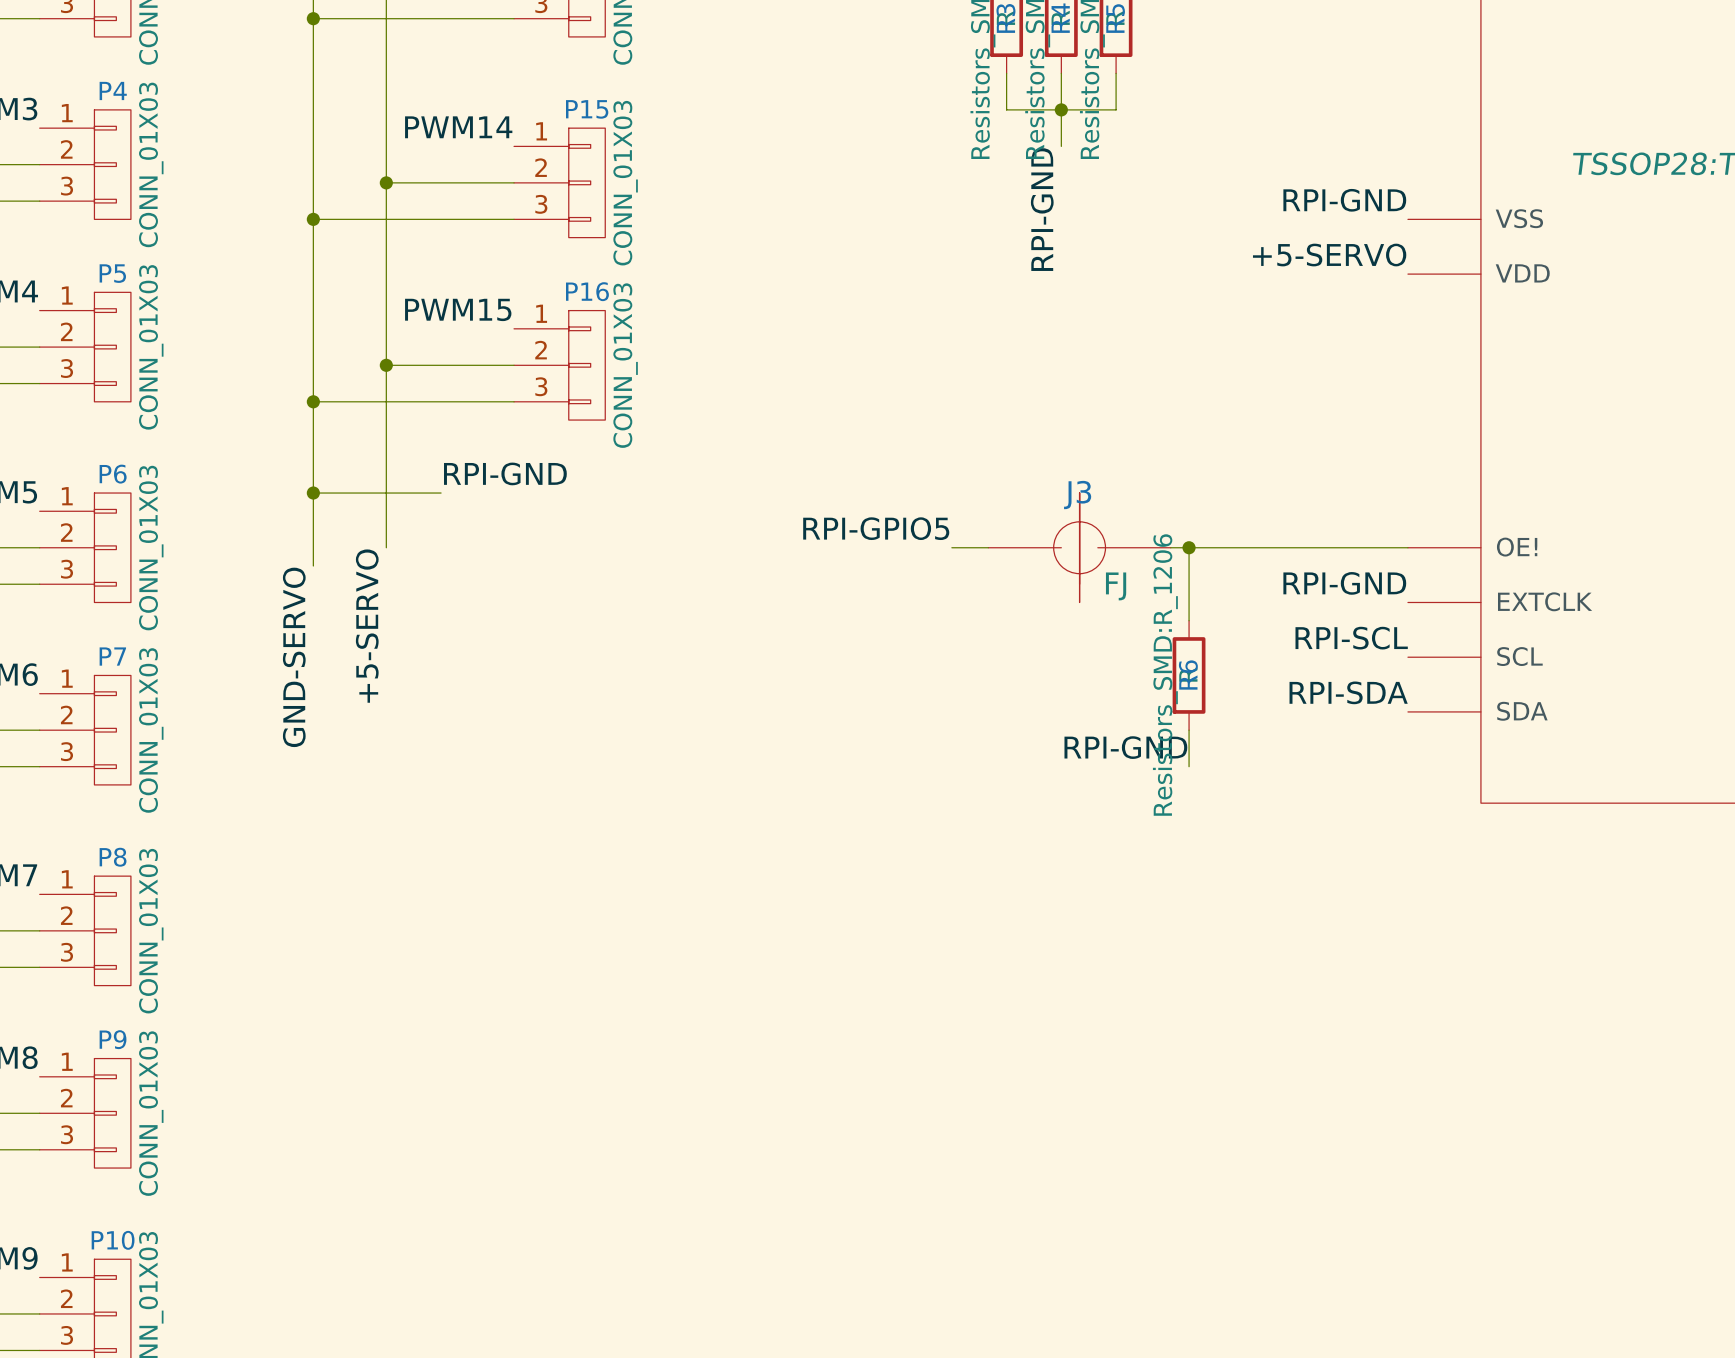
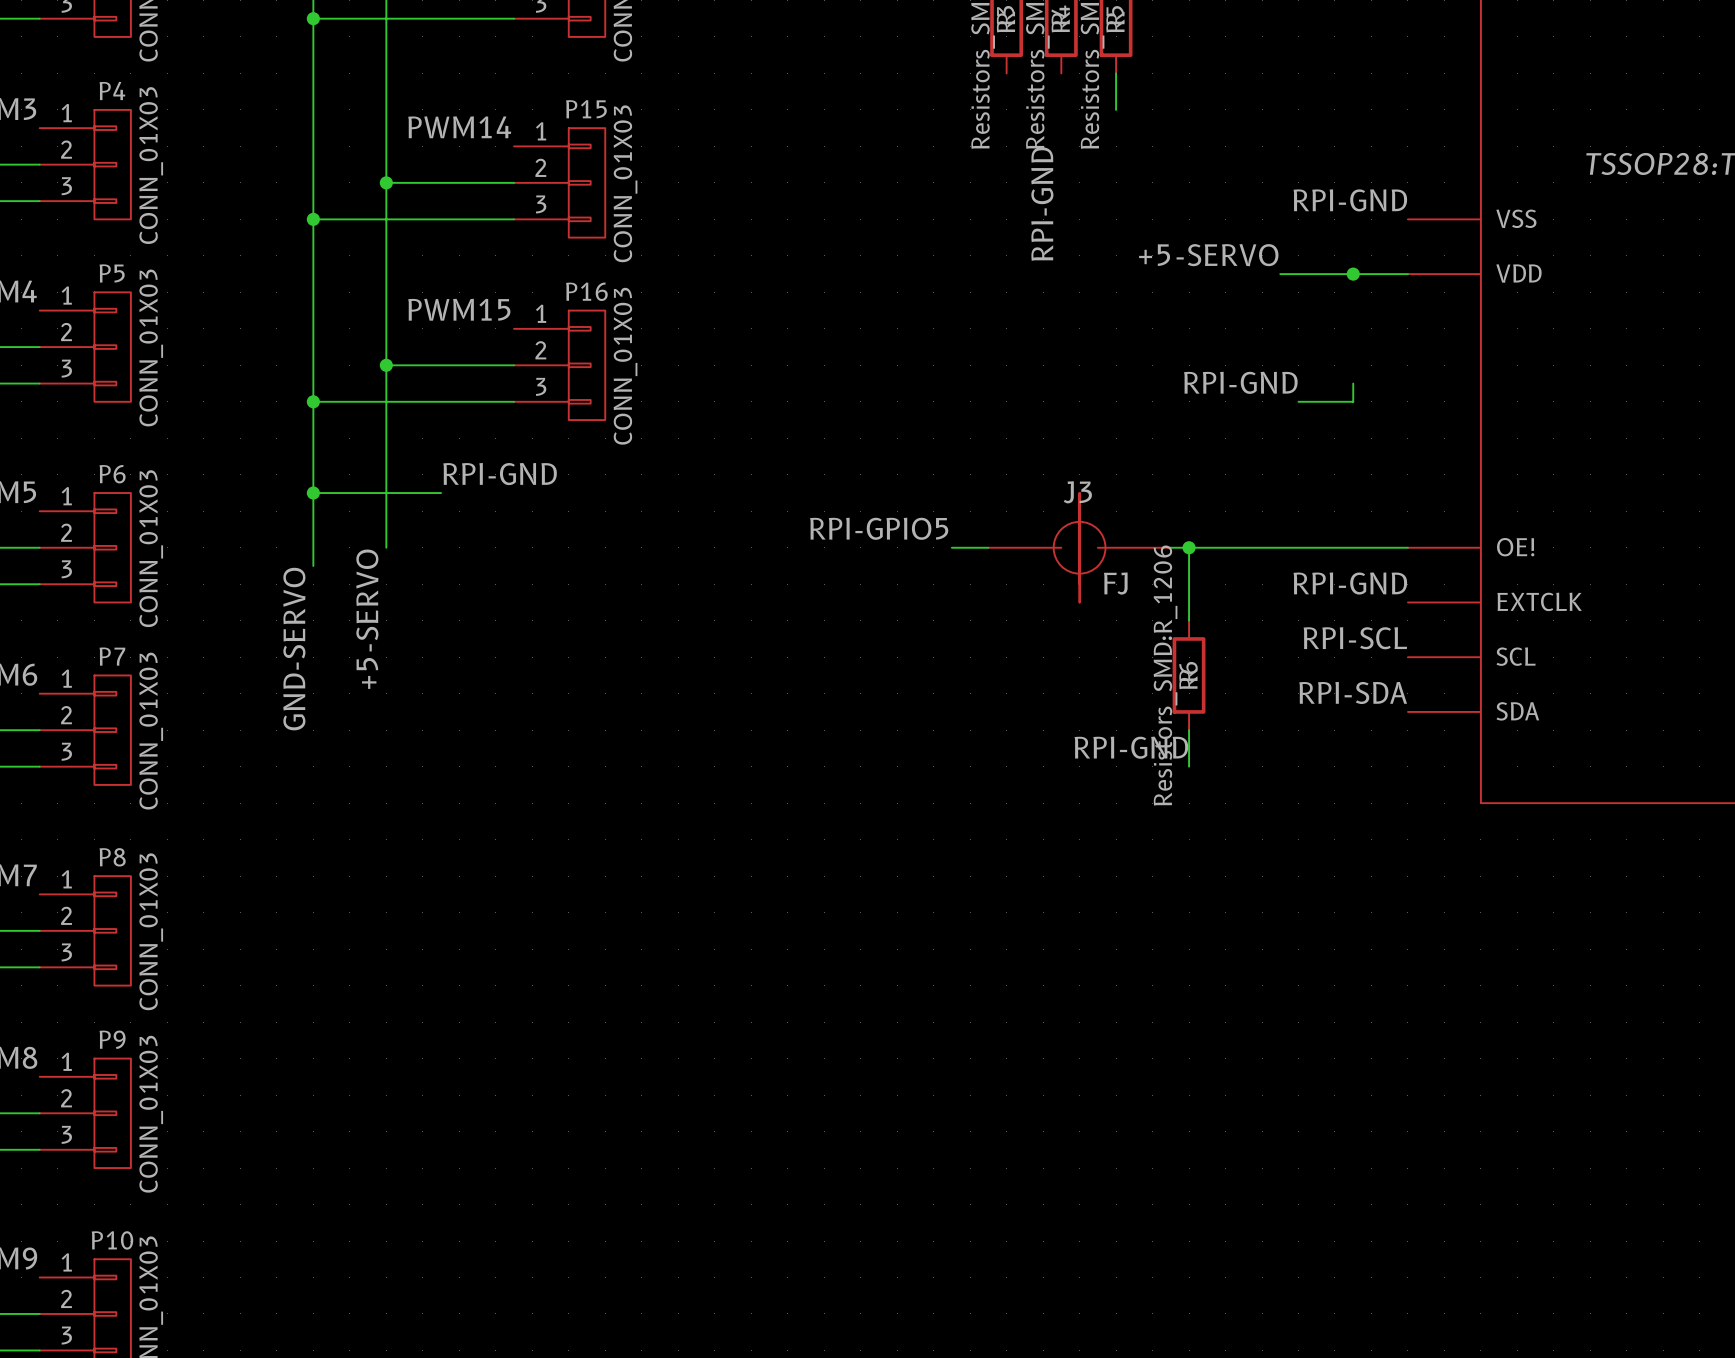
wire: (1006, 73) (1006, 109) (1116, 109) -> none
wire: (1061, 73) (1061, 146) -> none
junction: (1061, 109) -> none
label position: +5-SERVO (1329, 255) -> +5-SERVO (1208, 255)
wire: none -> (1280, 274) (1407, 274)
junction: none -> (1353, 274)
label: none -> RPI-GND (1240, 382)
wire: none -> (1353, 383) (1353, 401) (1298, 401)

